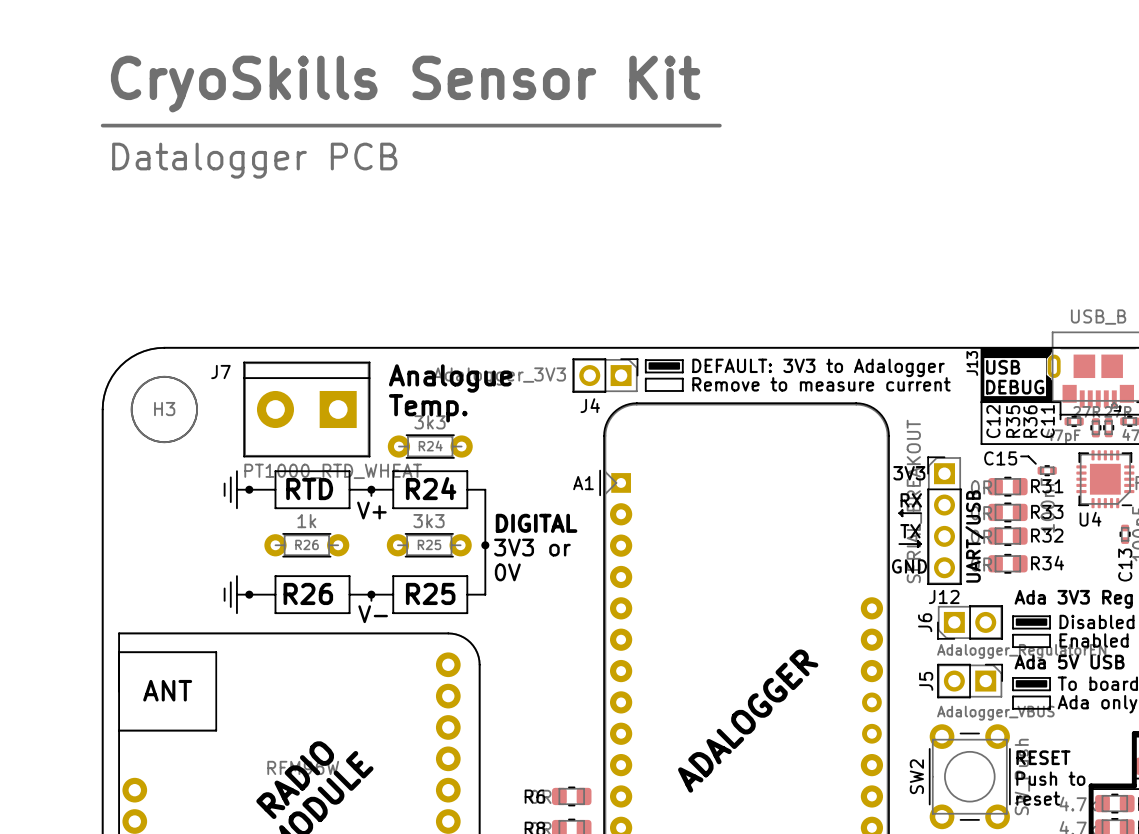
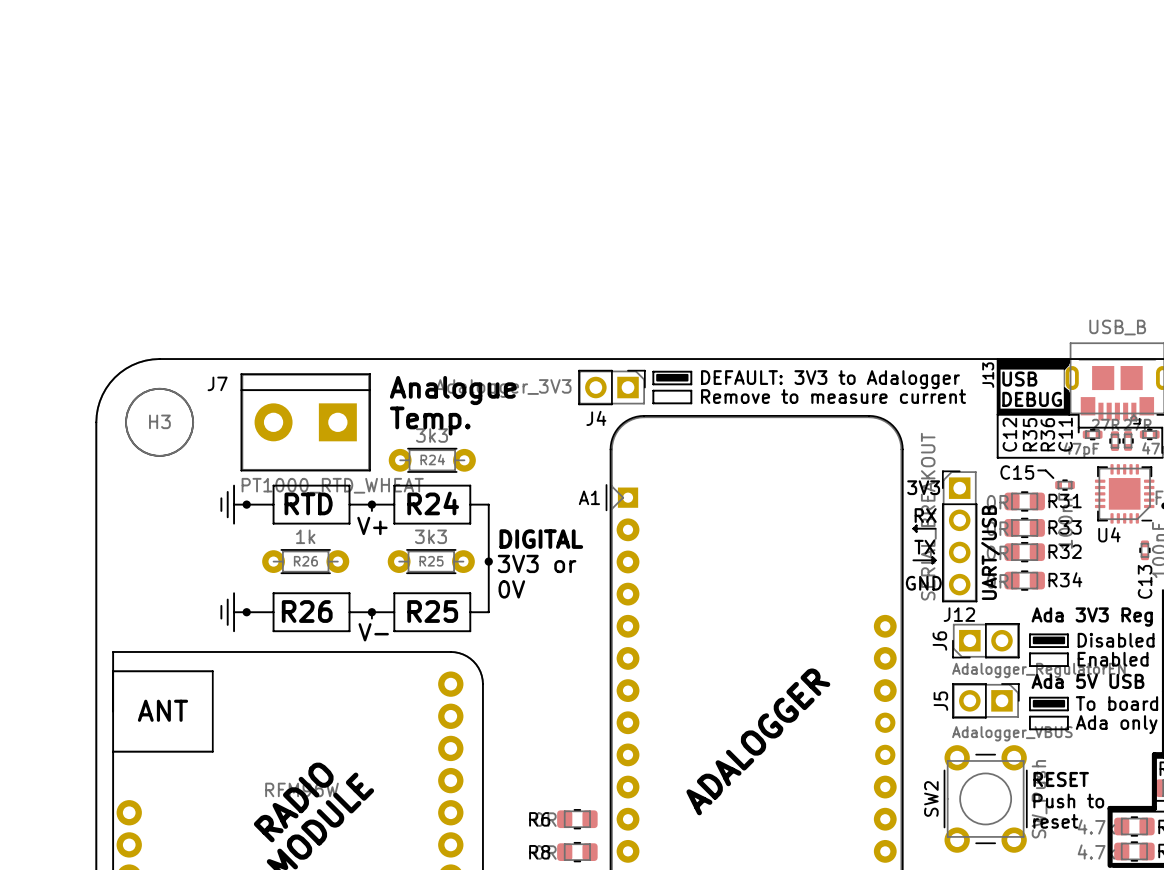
text: CryoSkills Sensor Kit (405, 84) -> none
line: (102, 125) (719, 125) -> none
text: Datalogger PCB (254, 160) -> none

